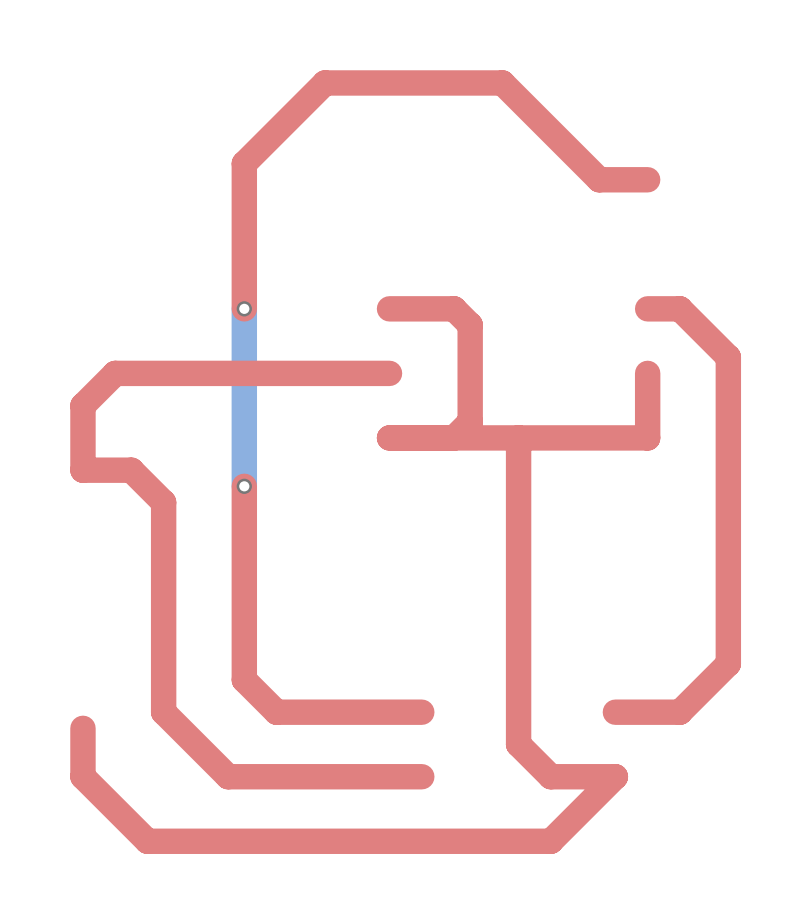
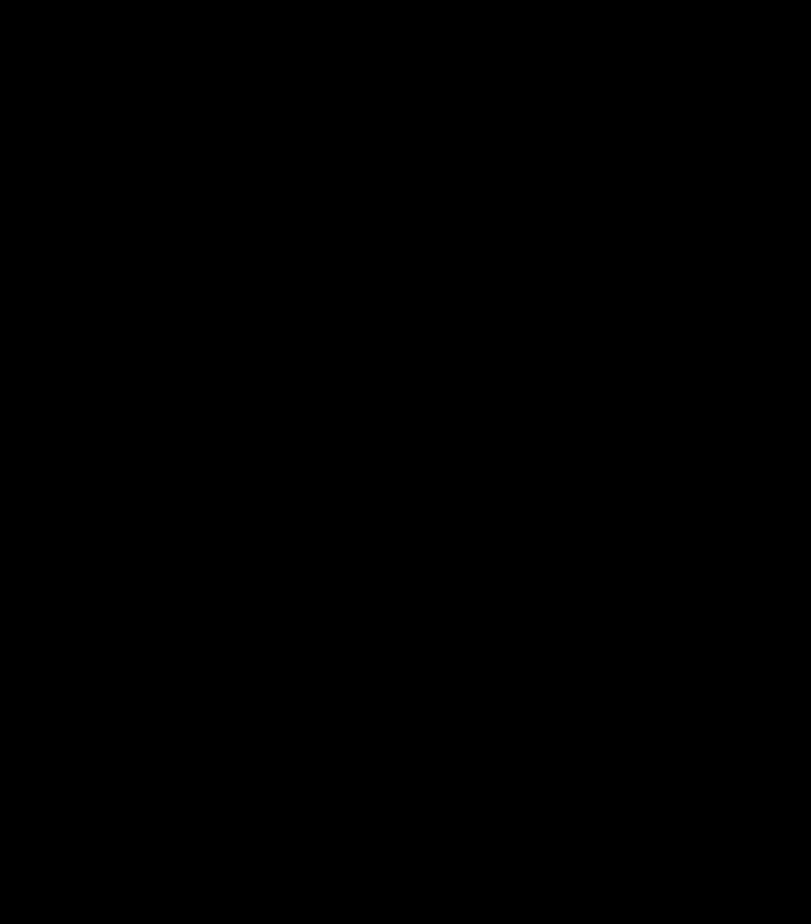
top track: (647, 179) (599, 179) (502, 82) (324, 82) (244, 163) (244, 308) -> none
bottom track: (244, 308) (244, 486) -> none
via: (244, 308) -> none
top track: (389, 308) (454, 308) (470, 324) (470, 421) (454, 437) -> none
top track: (647, 308) (679, 308) (728, 357) (728, 663) (679, 712) (615, 712) -> none
top track: (389, 373) (115, 373) (82, 405) (82, 470) (131, 470) (163, 502) (163, 712) (228, 776) (421, 776) -> none
top track: (647, 373) (647, 437) (389, 437) -> none
top track: (518, 437) (518, 744) (550, 776) (615, 776) (550, 841) (147, 841) (82, 776) (82, 728) -> none
top track: (244, 486) (244, 679) (276, 712) (421, 712) -> none
via: (244, 486) -> none

